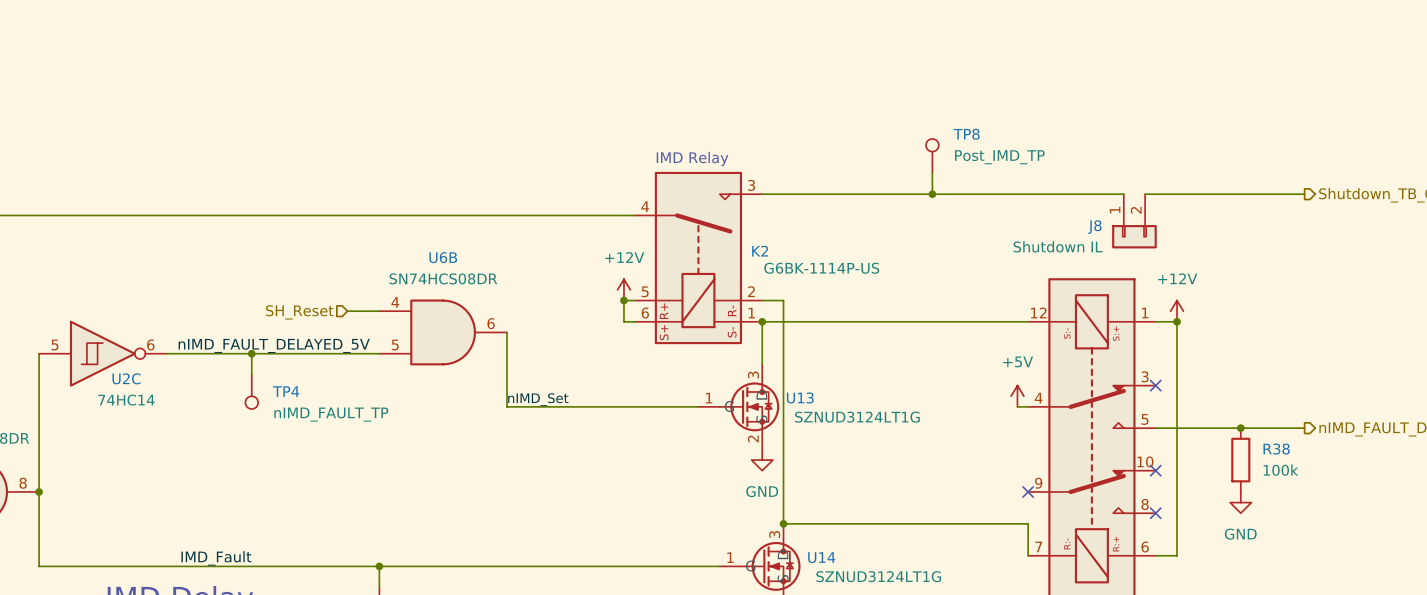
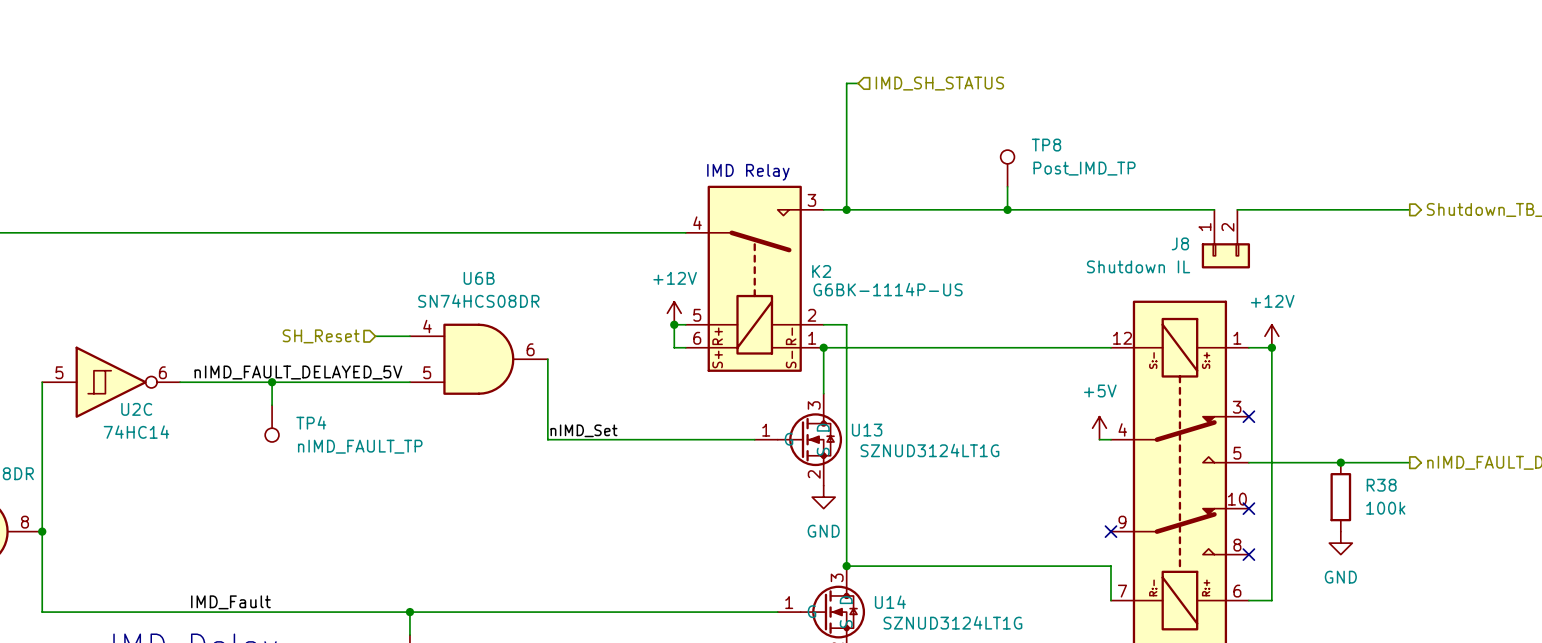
wire: none -> (858, 83) (846, 83) (846, 209)
hierarchical label: none -> IMD_SH_STATUS (939, 83)
junction: none -> (846, 209)

